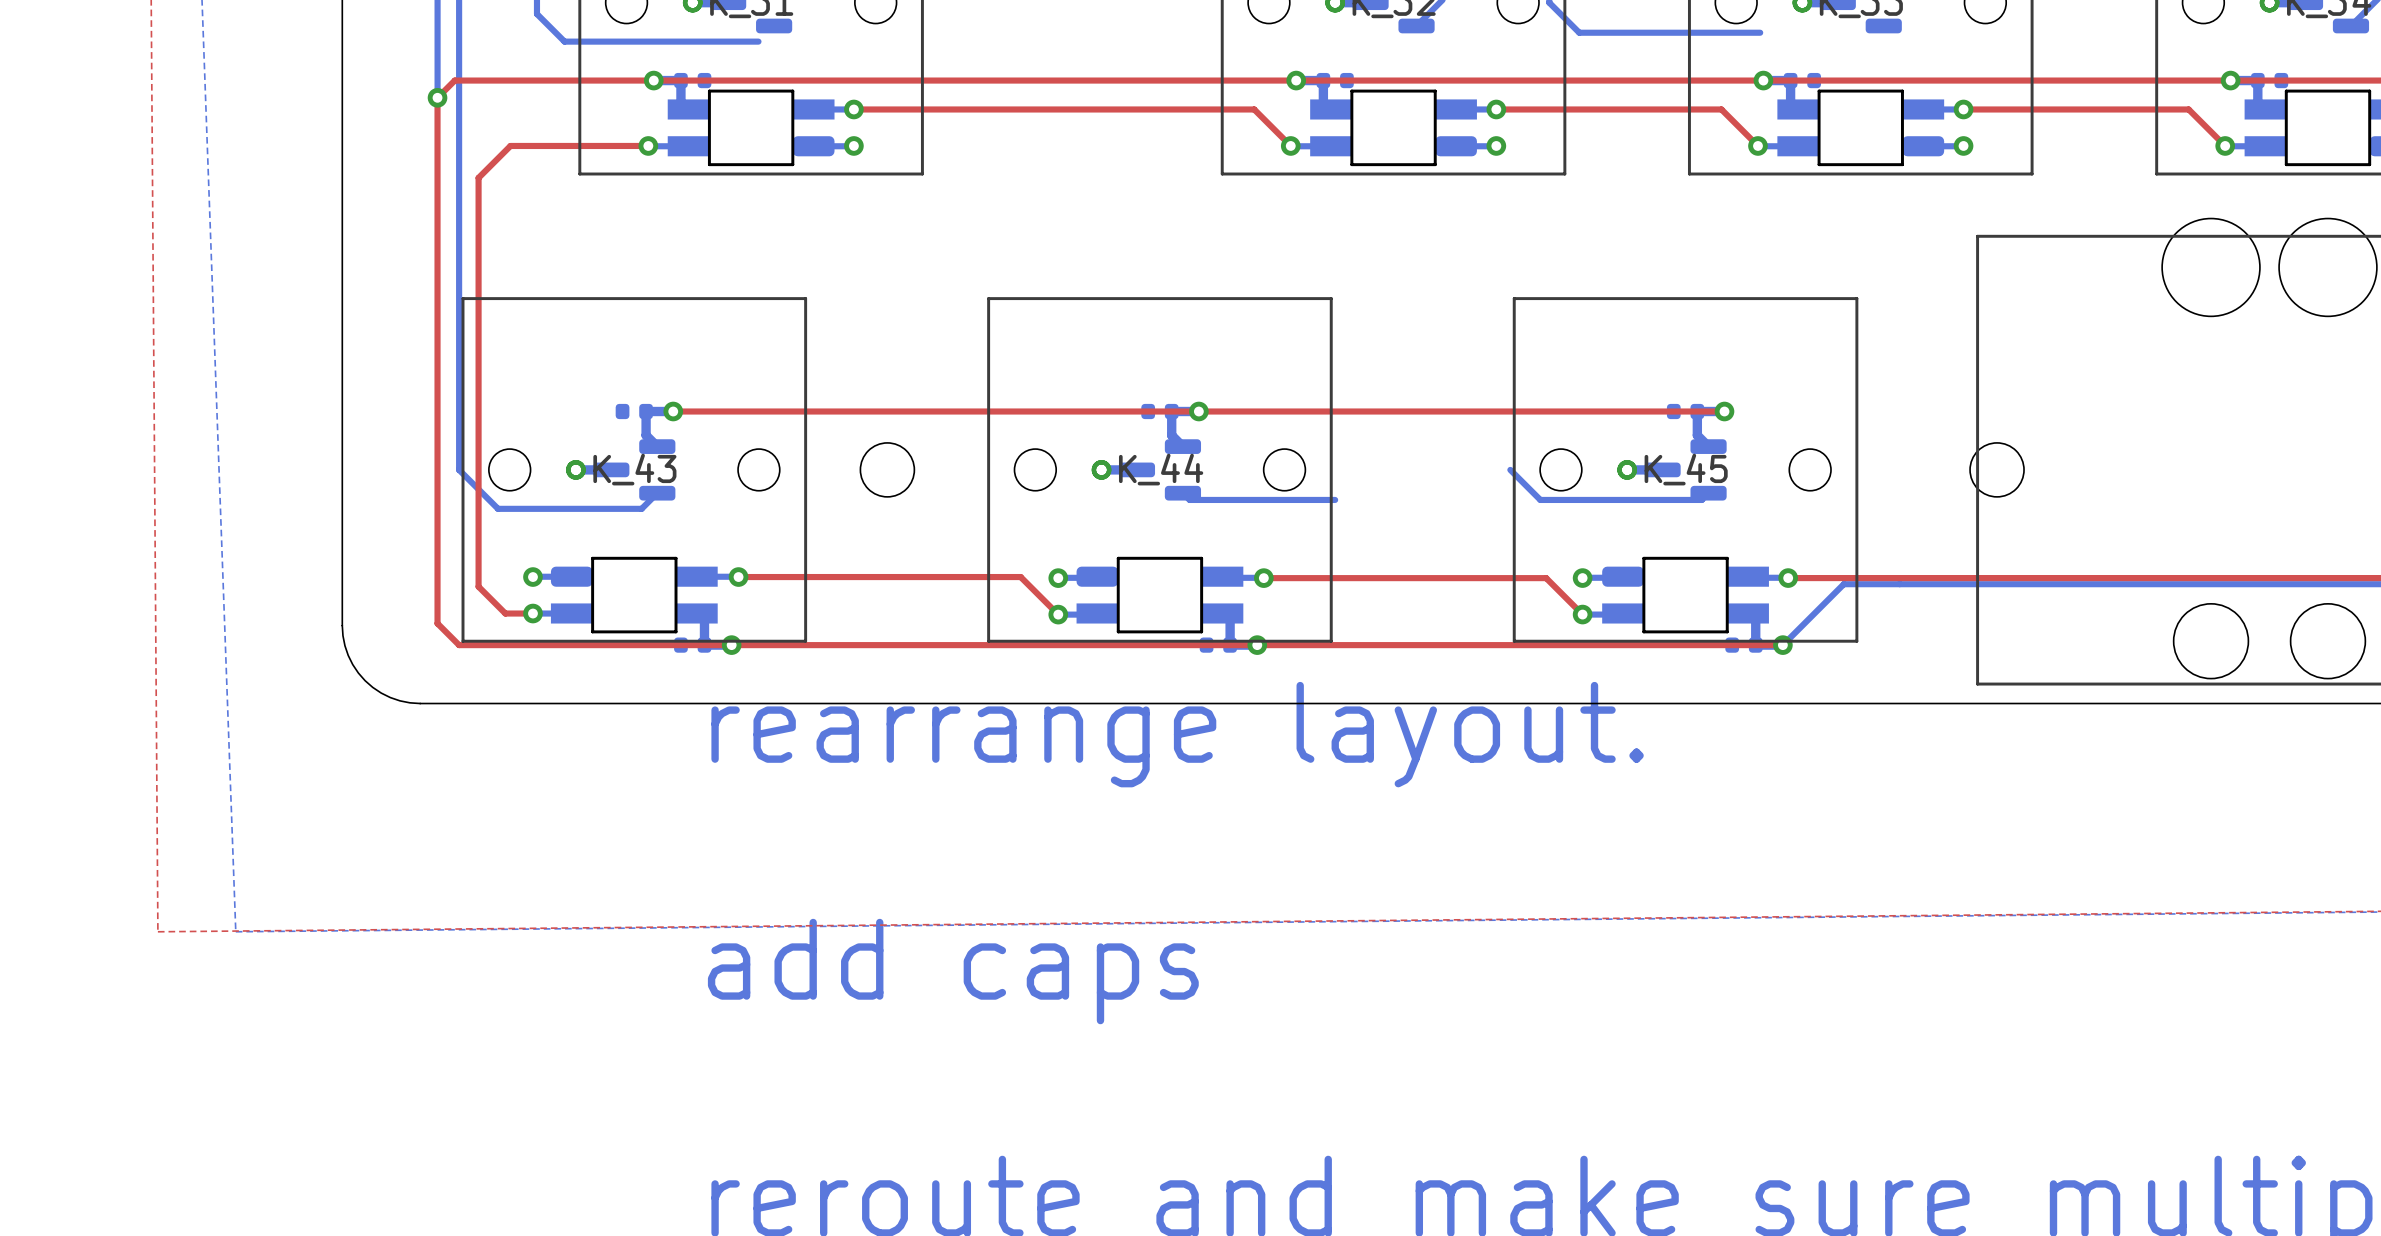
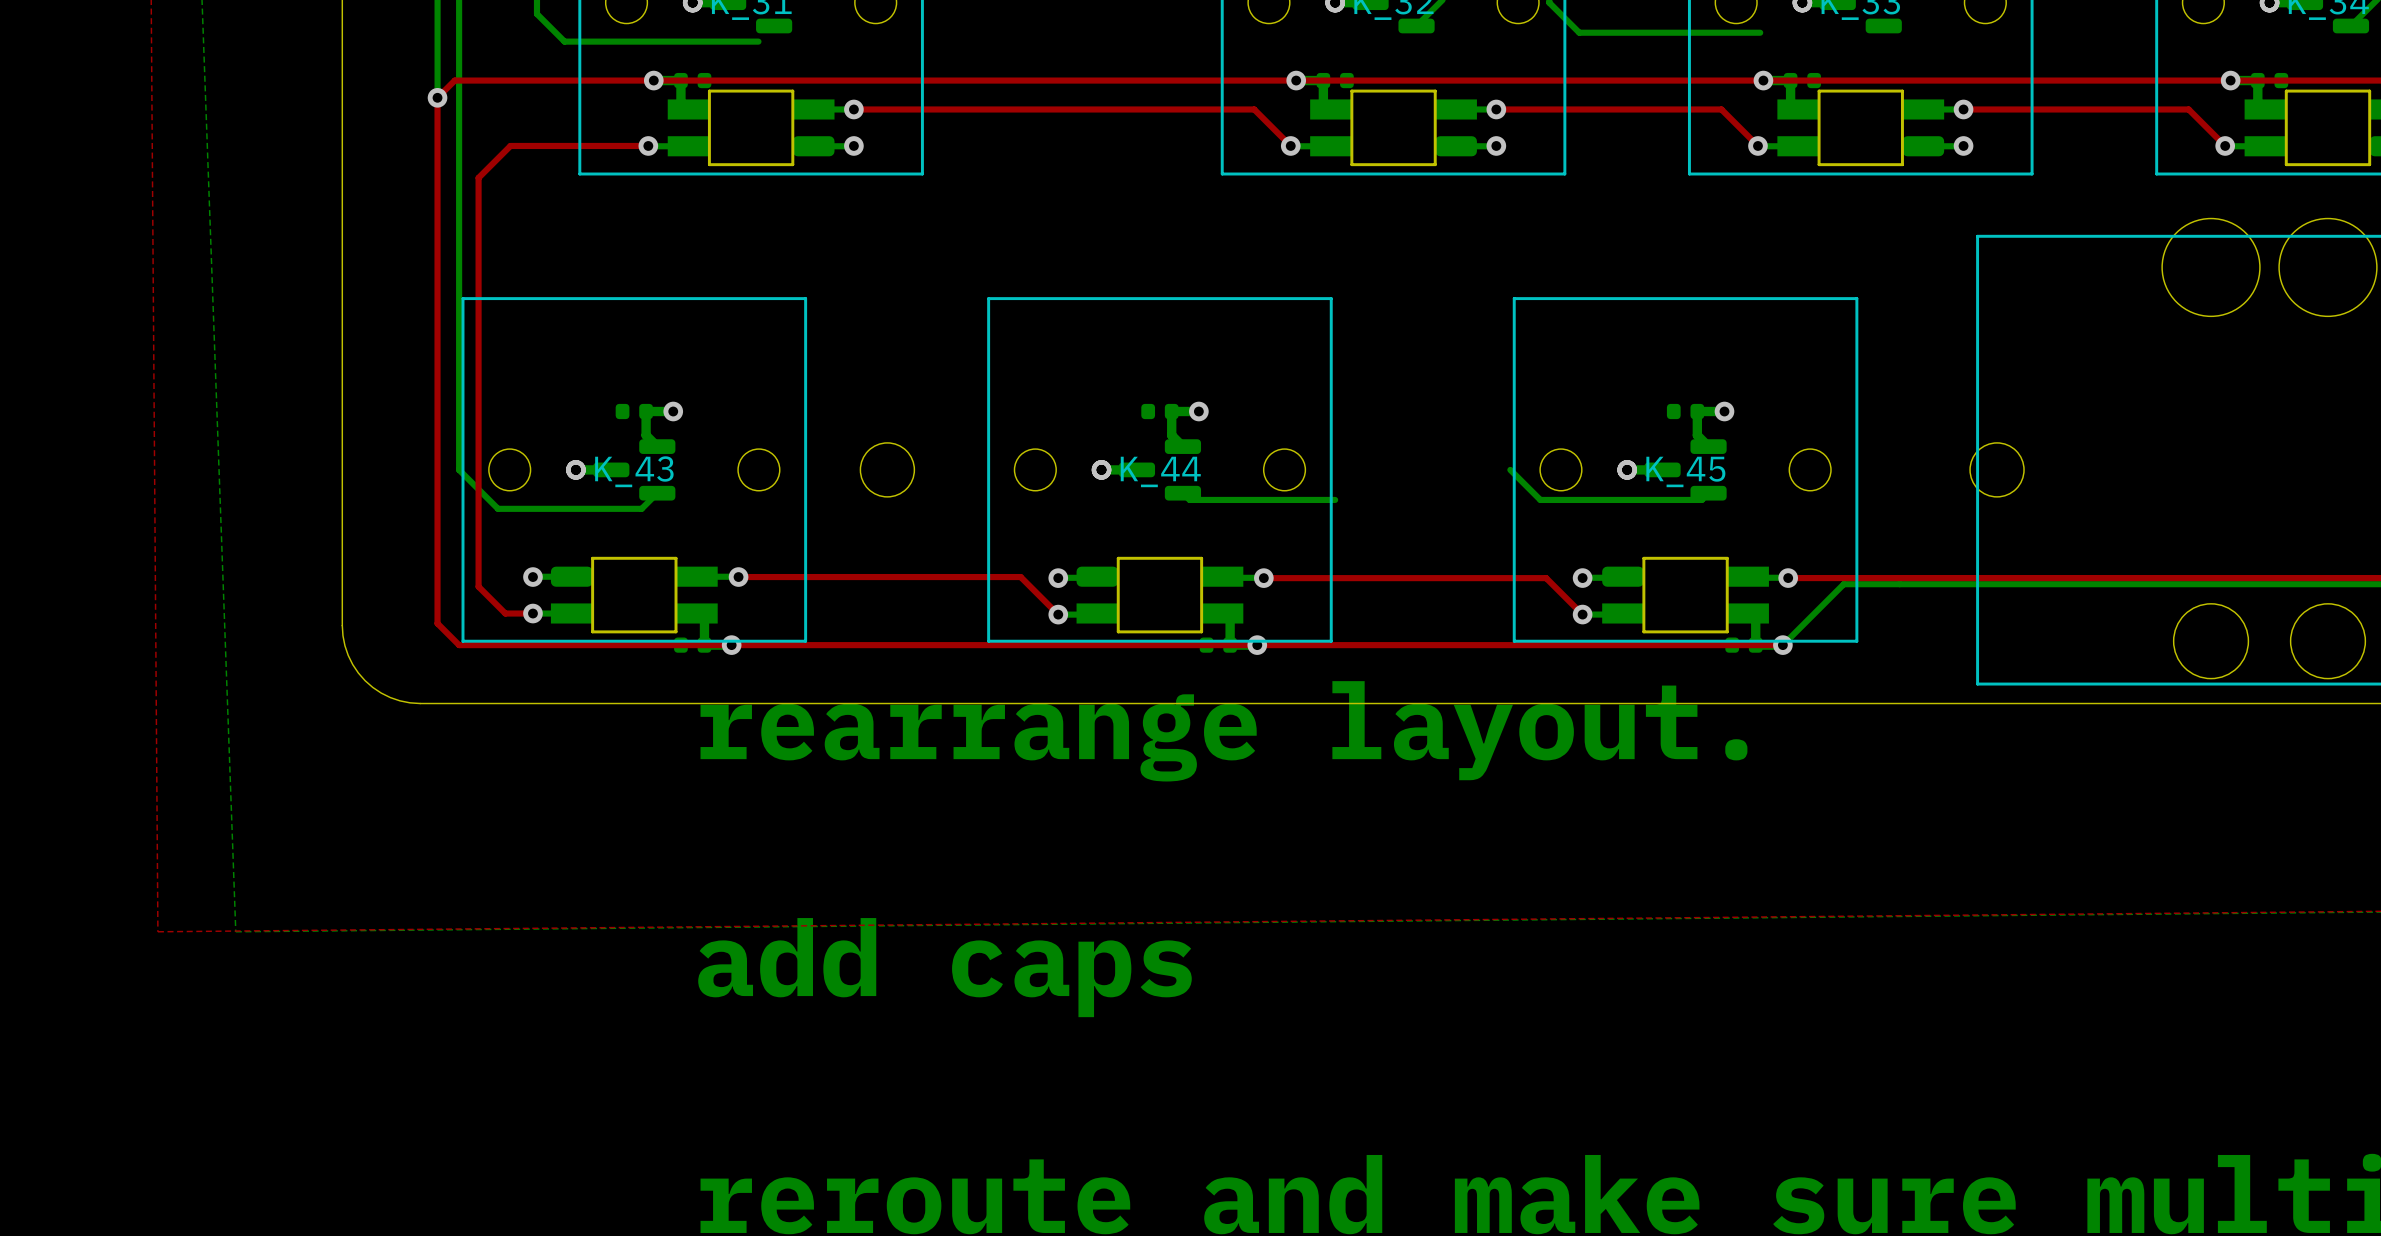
top track: (673, 411) (1724, 411) -> none

